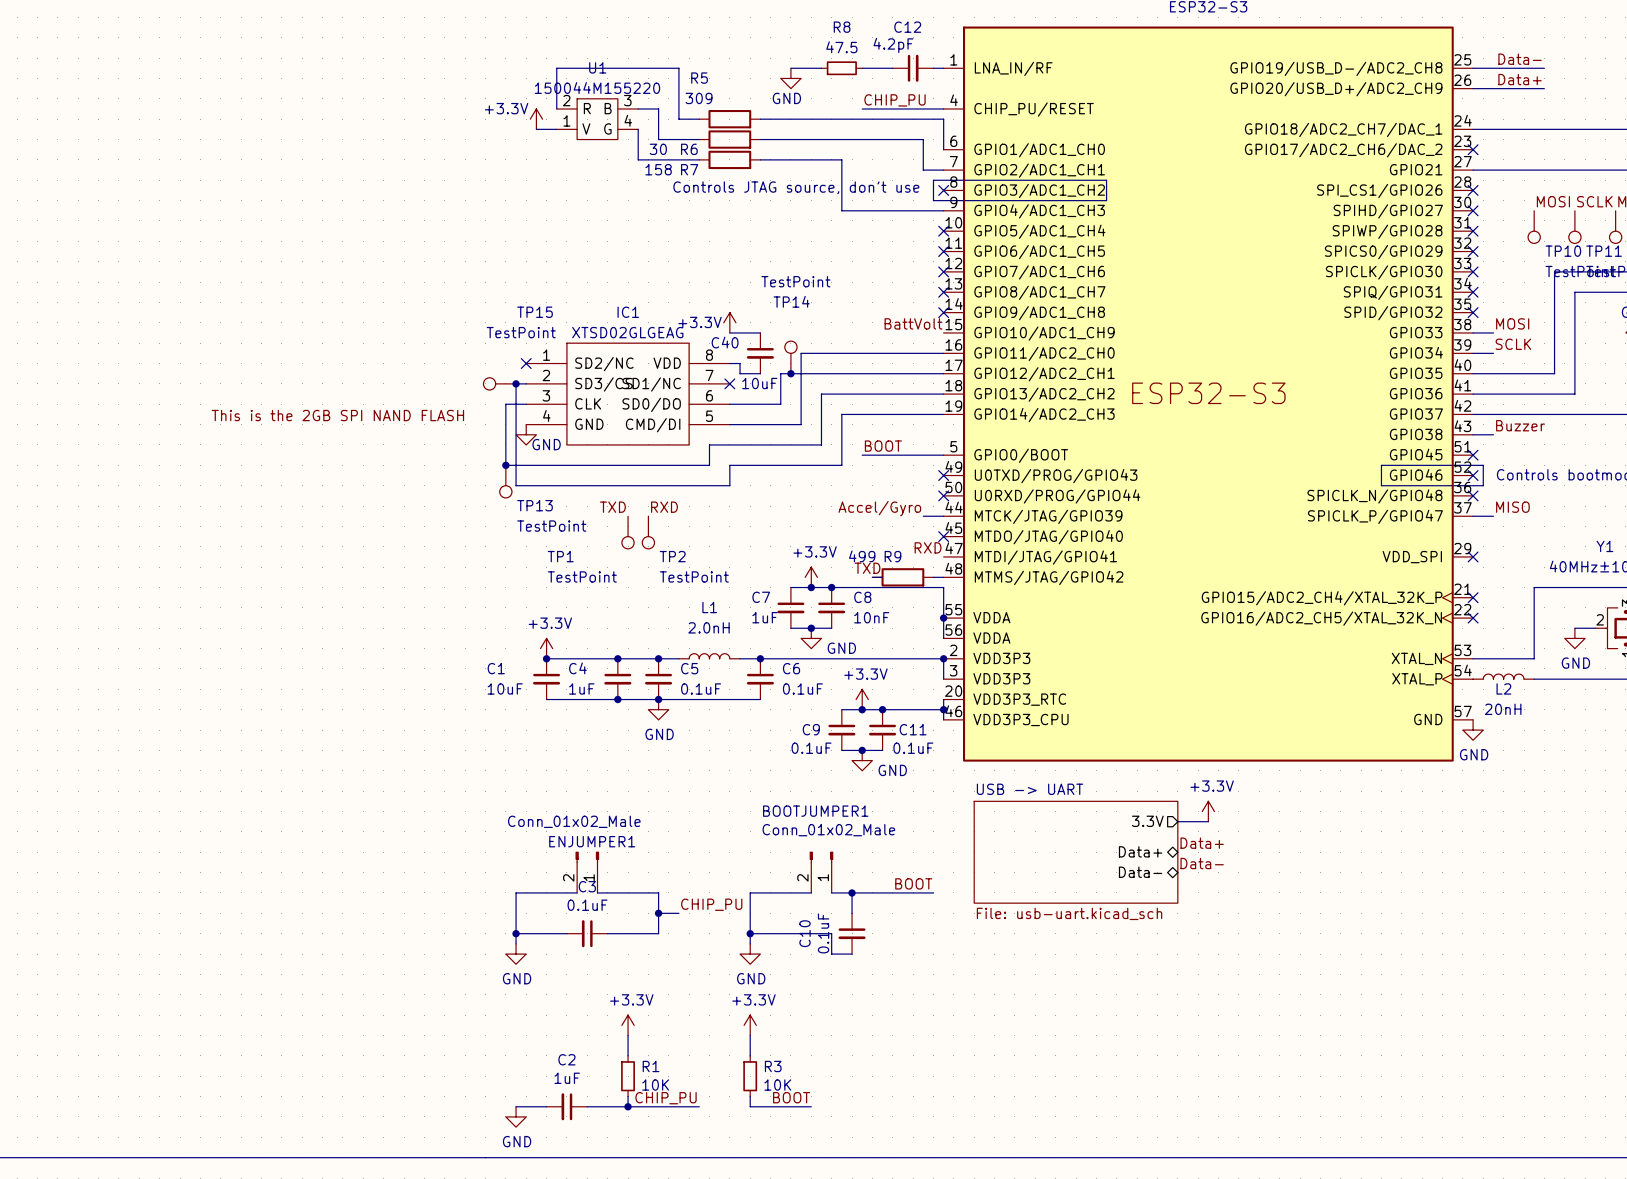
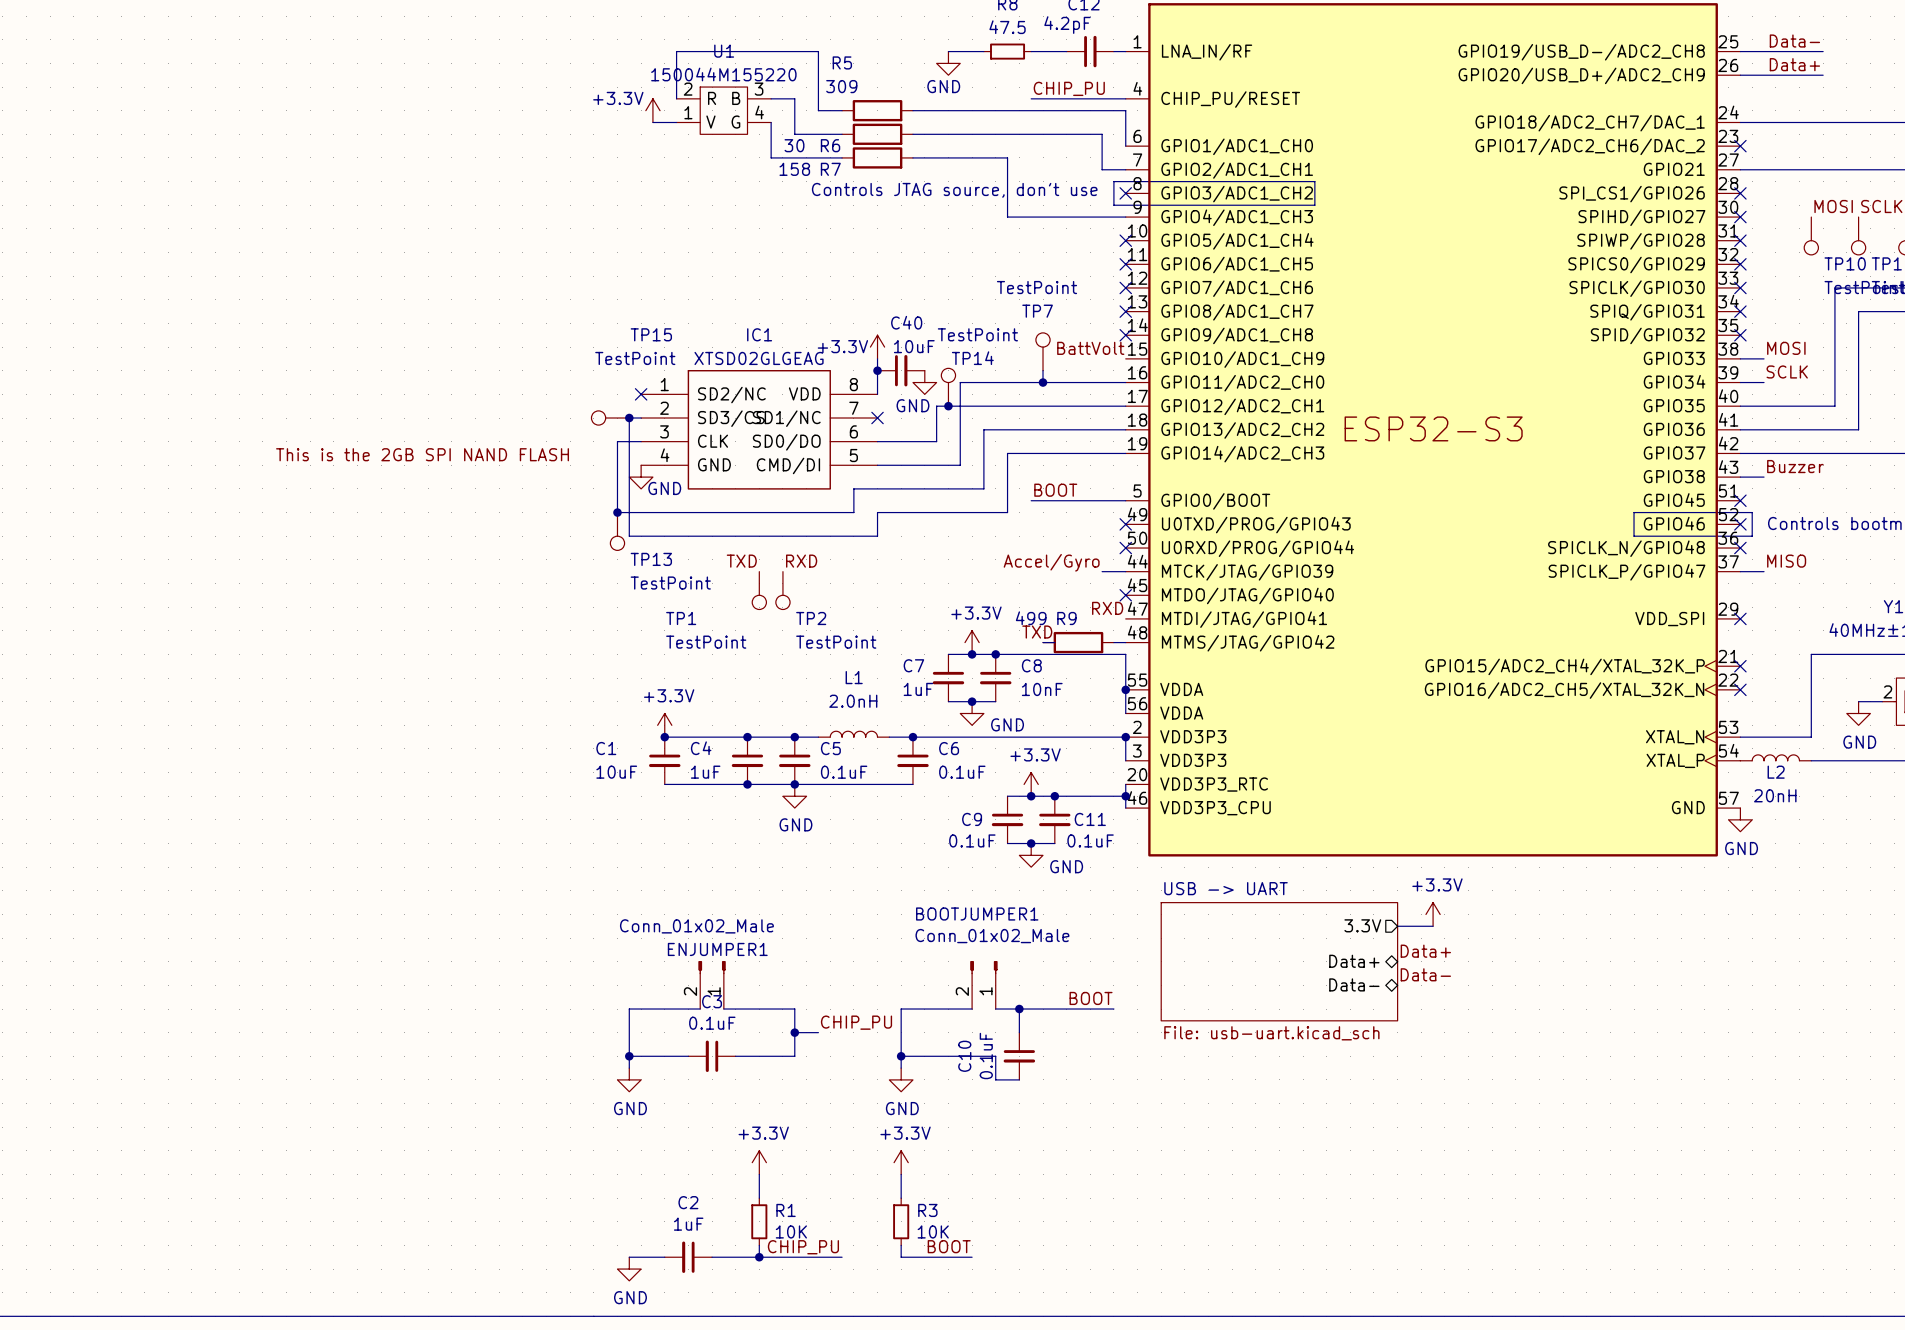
TP14 value position: TestPoint (795, 281) -> TestPoint (977, 334)
TP14 name position: TP14 (791, 301) -> TP14 (972, 358)
TP7: none -> TestPoint (1043, 351)
wire: (729, 332) (760, 332) -> (877, 358) (877, 394)
C40 name position: C40 (725, 342) -> C40 (906, 322)
junction: none -> (877, 370)
wire: none -> (1043, 370) (1043, 382)
C40 rotation: 0° (760, 353) -> 90° counterclockwise (901, 370)
power symbol: none -> GND (924, 382)
junction: none -> (1043, 382)
wire: (729, 363) (740, 363) (740, 373) (760, 373) -> none
C40 value position: 10uF (759, 383) -> 10uF (914, 346)

